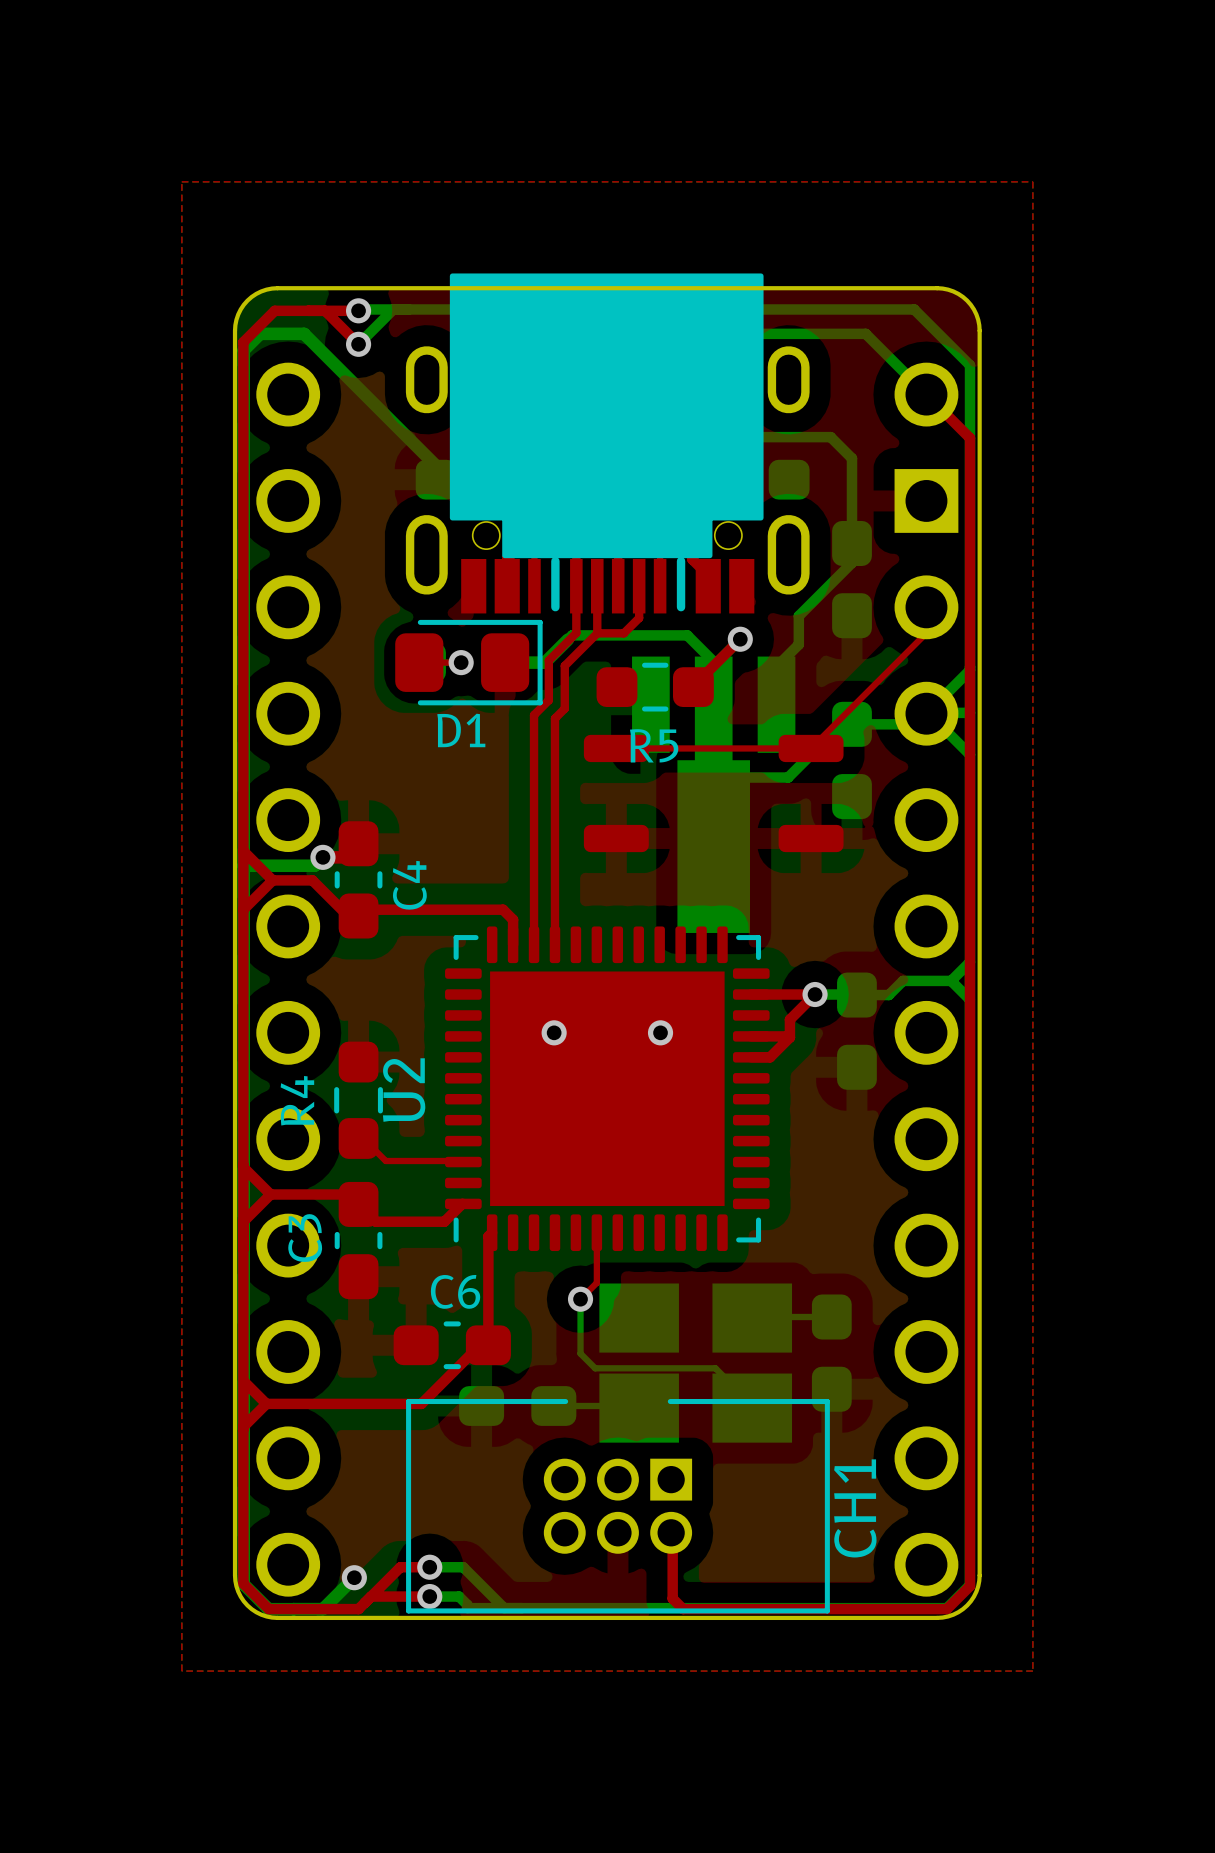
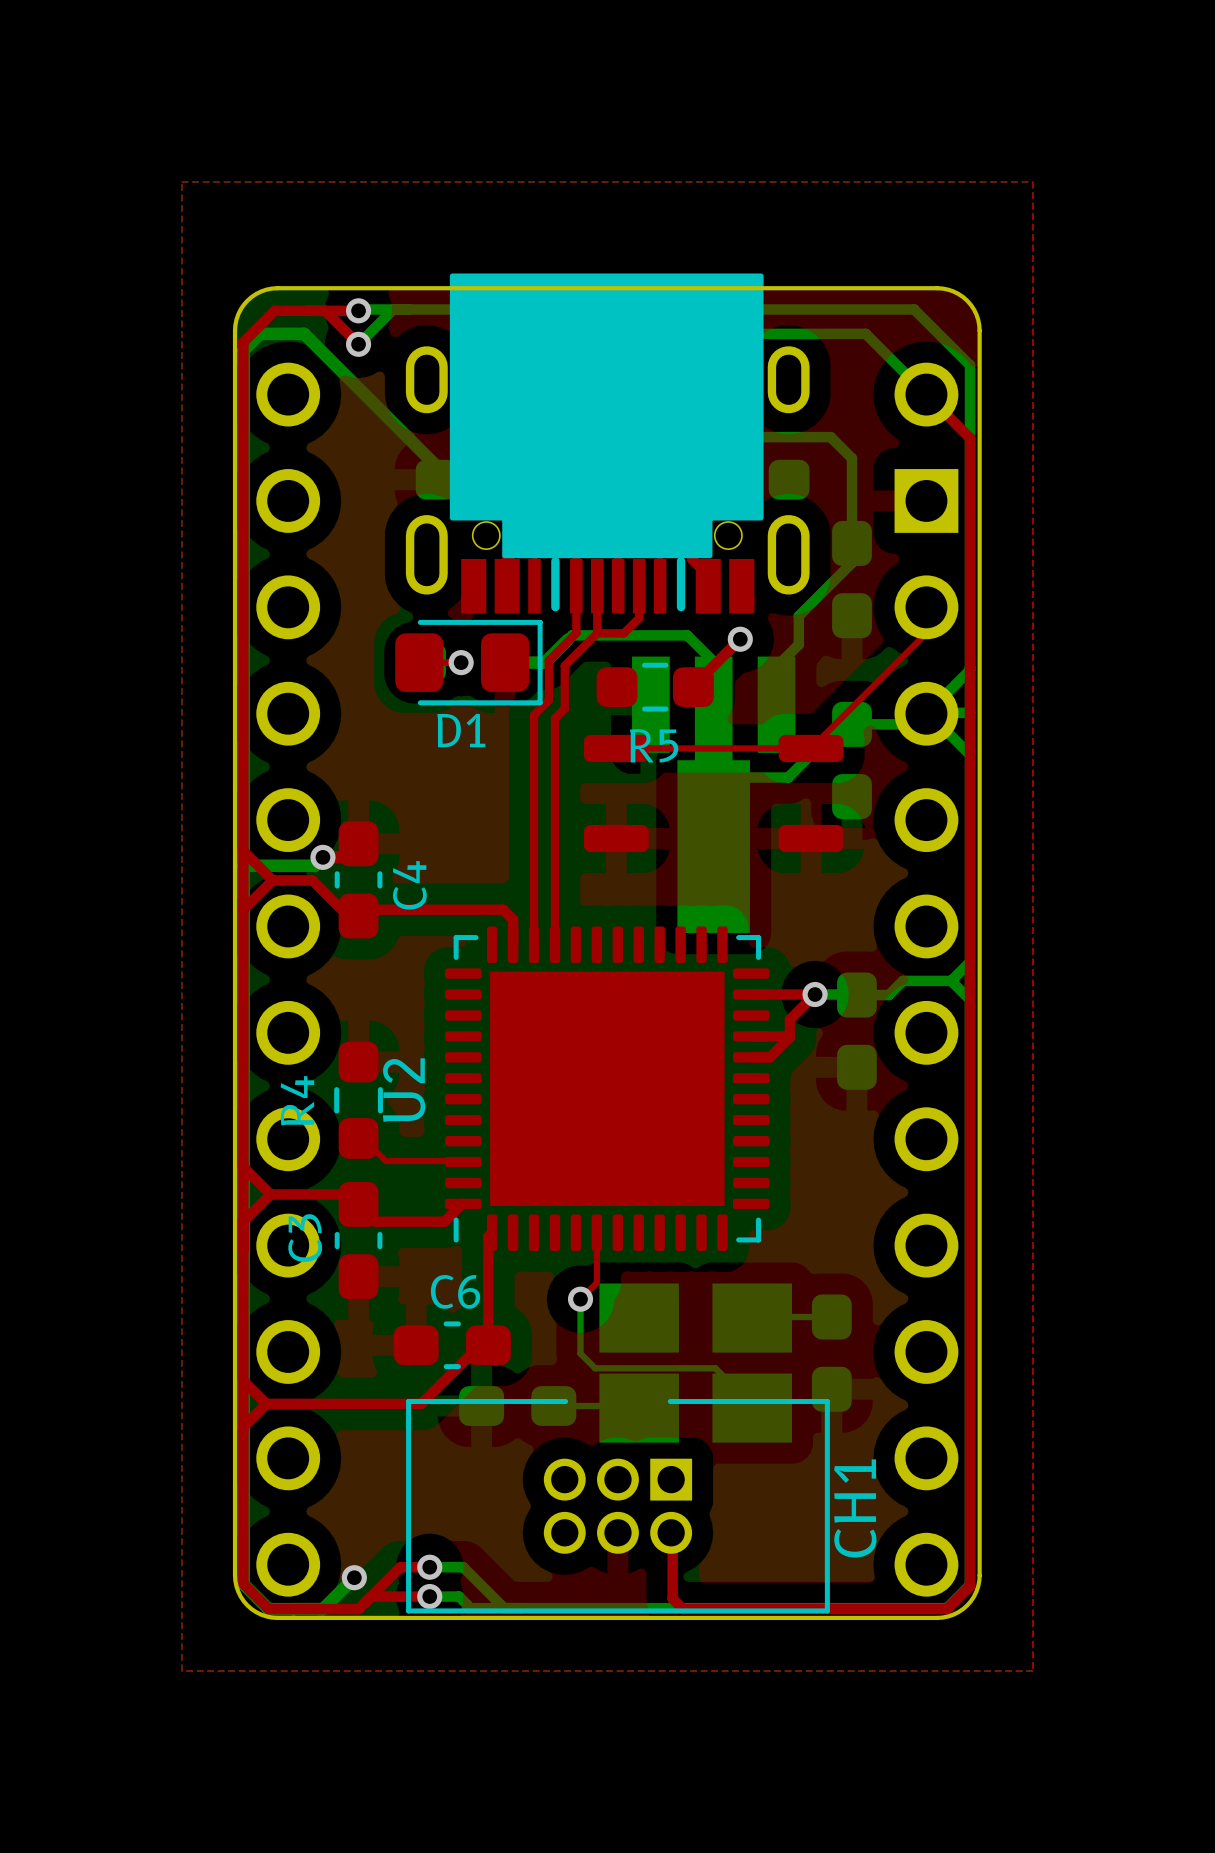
via: (554, 1032) -> none
via: (660, 1032) -> none

